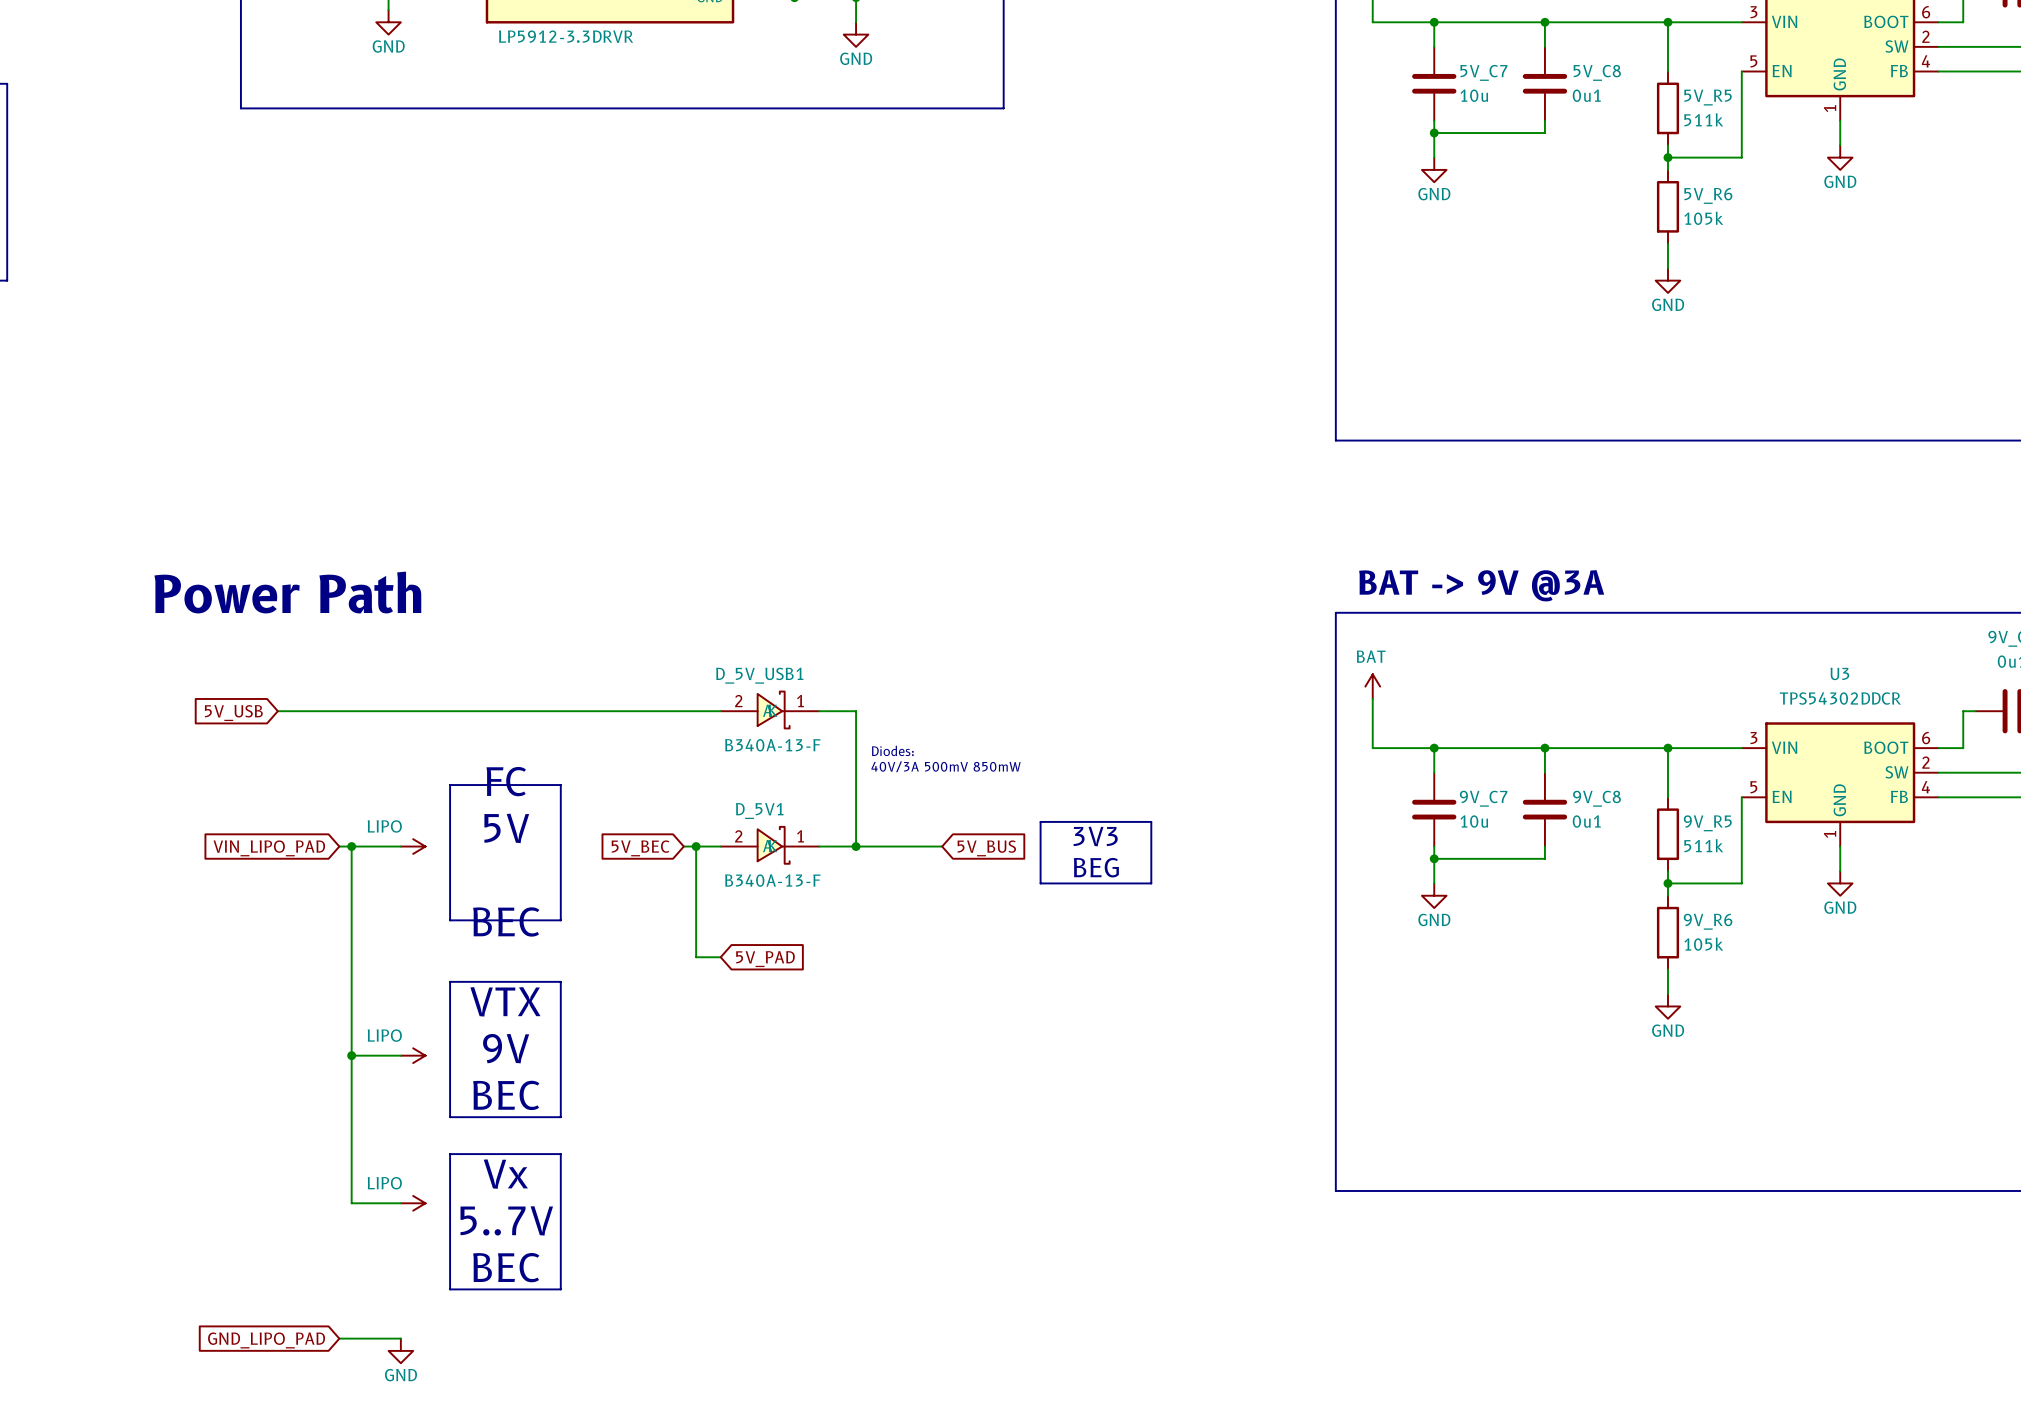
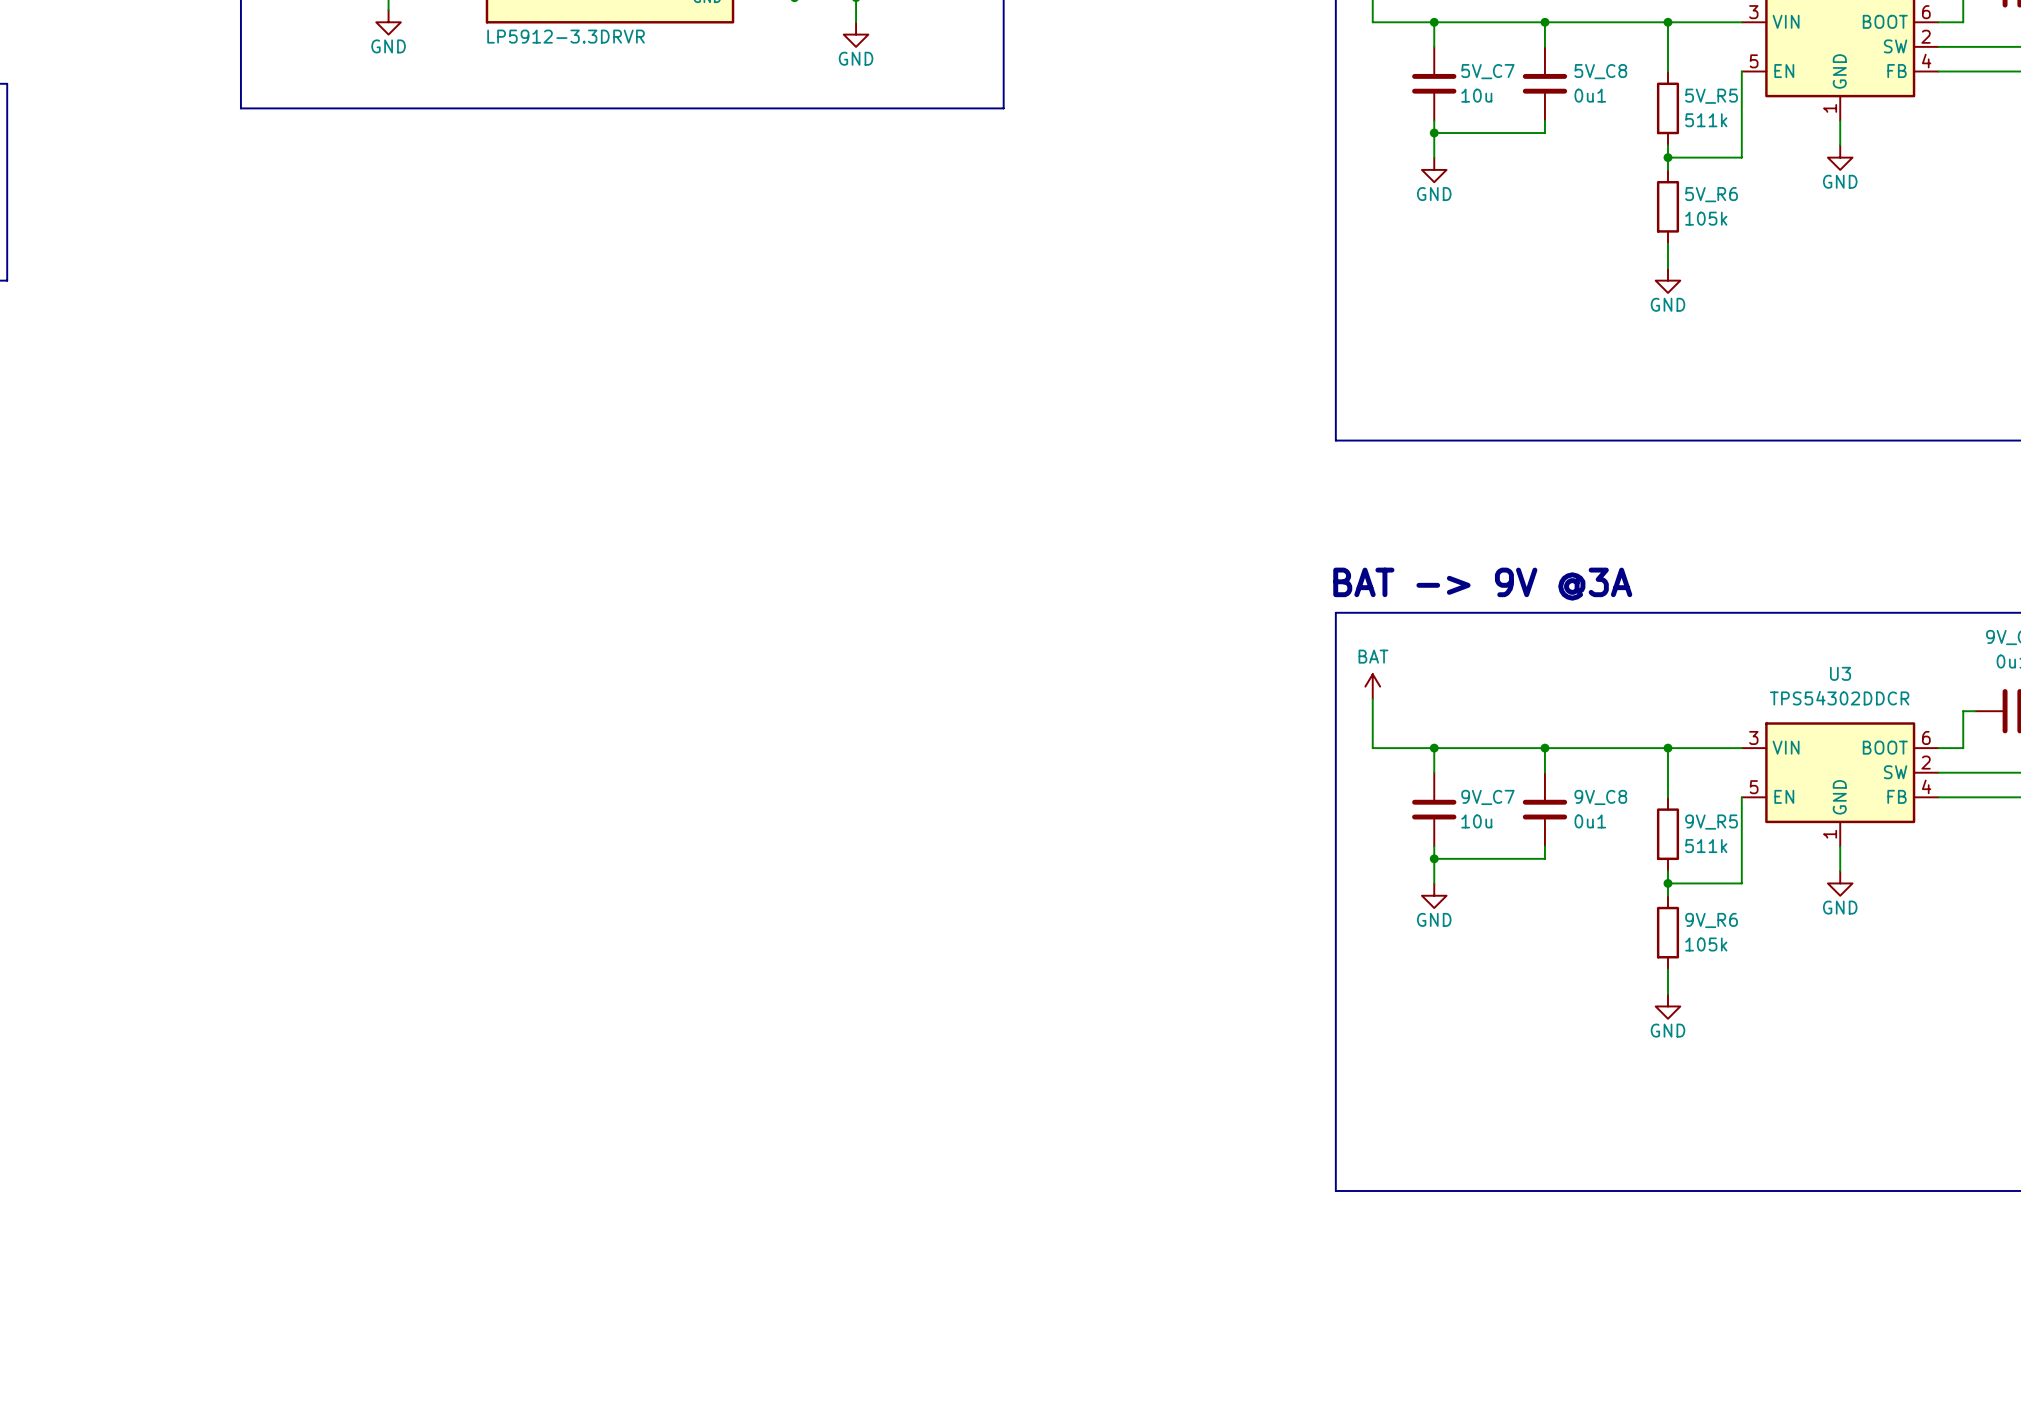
text: Power Path (287, 592) -> none
D_5V_USB1: B340A-13-F (769, 710) -> none
wire: (277, 711) (720, 711) -> none
wire: (819, 711) (856, 711) (856, 846) -> none
global label: 5V_USB (233, 713) -> none
text: Diodes: (892, 750) -> none
text: 40V/3A 500mV 850mW (946, 766) -> none
text: FC (506, 781) -> none
line: (450, 785) (450, 920) (560, 920) (560, 785) (450, 785) -> none
line: (1040, 821) (1151, 821) (1151, 883) (1040, 883) (1040, 821) -> none
text: 5V (506, 828) -> none
text: 3V3 (1095, 836) -> none
D_5V1: B340A-13-F (769, 845) -> none
wire: (339, 846) (400, 846) -> none
wire: (351, 846) (351, 1203) (400, 1203) -> none
junction: (351, 846) -> none
power symbol: LIPO (413, 846) -> none
wire: (683, 846) (720, 846) -> none
wire: (696, 846) (696, 957) (720, 957) -> none
junction: (696, 846) -> none
wire: (819, 846) (942, 846) -> none
junction: (856, 846) -> none
global label: VIN_LIPO_PAD (269, 848) -> none
global label: 5V_BEC (640, 848) -> none
global label: 5V_BUS (986, 848) -> none
text: BEG (1096, 867) -> none
text: BEC (506, 921) -> none
global label: 5V_PAD (765, 959) -> none
line: (450, 981) (560, 981) (560, 1117) (450, 1117) (450, 981) -> none
text: VTX (505, 1001) -> none
text: 9V (506, 1048) -> none
wire: (351, 1055) (400, 1055) -> none
junction: (351, 1055) -> none
power symbol: LIPO (413, 1055) -> none
text: BEC (506, 1095) -> none
line: (450, 1154) (450, 1289) (560, 1289) (560, 1154) (450, 1154) -> none
text: Vx (505, 1174) -> none
power symbol: LIPO (413, 1203) -> none
text: 5..7V (506, 1220) -> none
text: BEC (506, 1267) -> none
wire: (339, 1338) (400, 1338) -> none
global label: GND_LIPO_PAD (266, 1340) -> none
power symbol: GND (400, 1350) -> none

